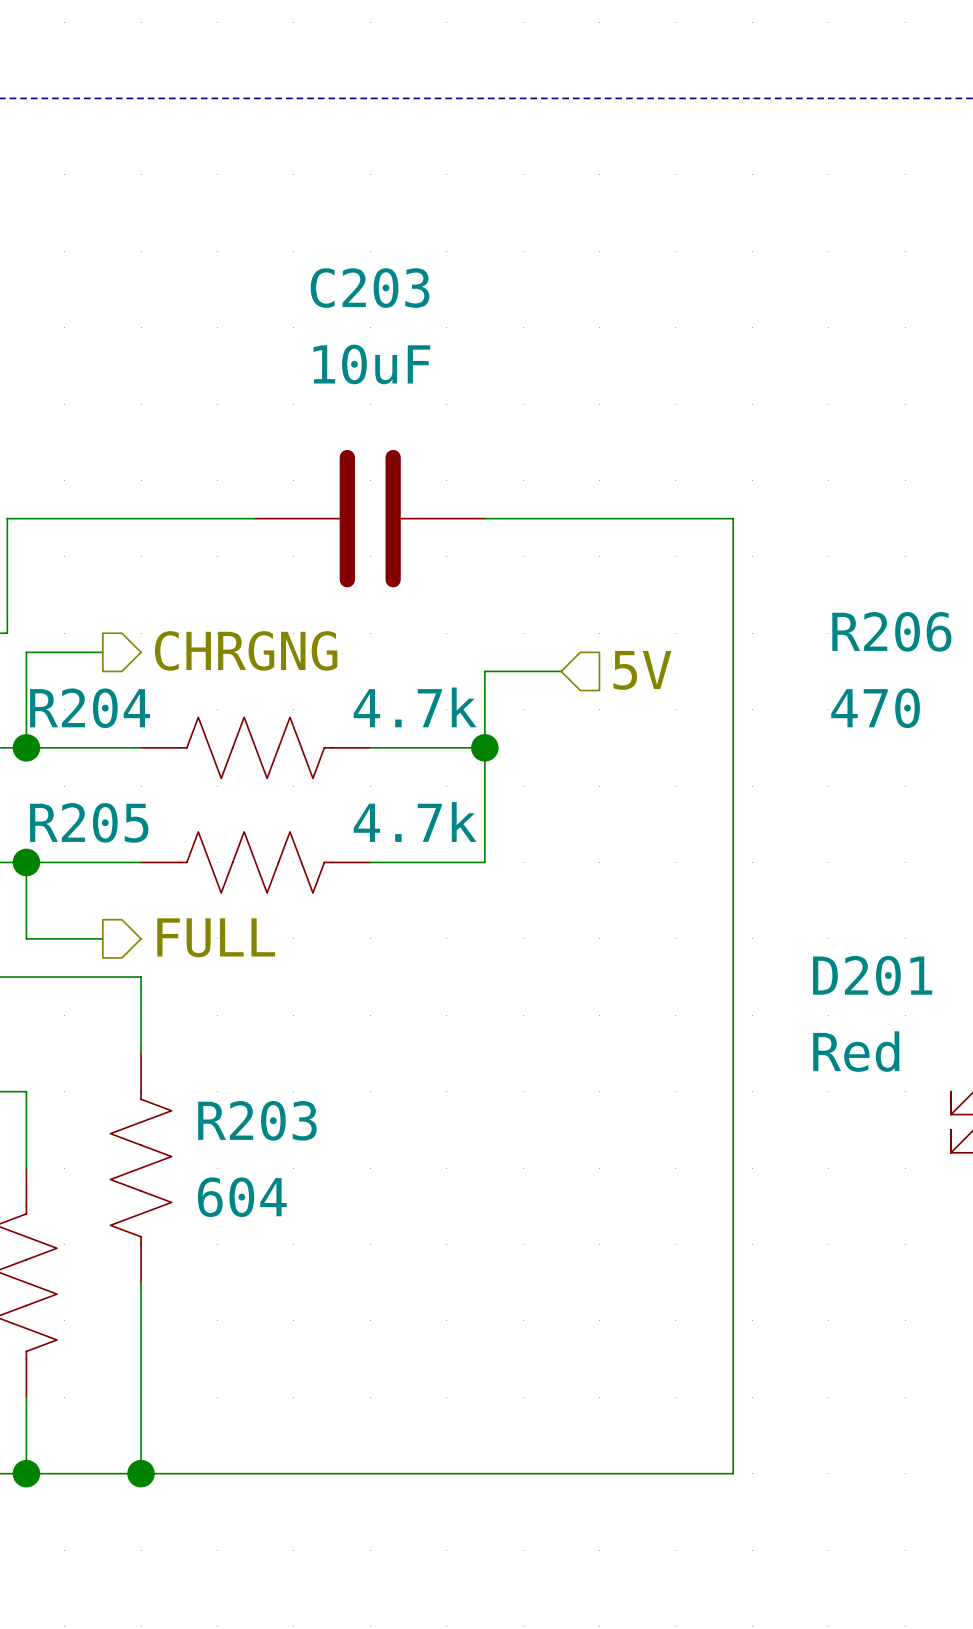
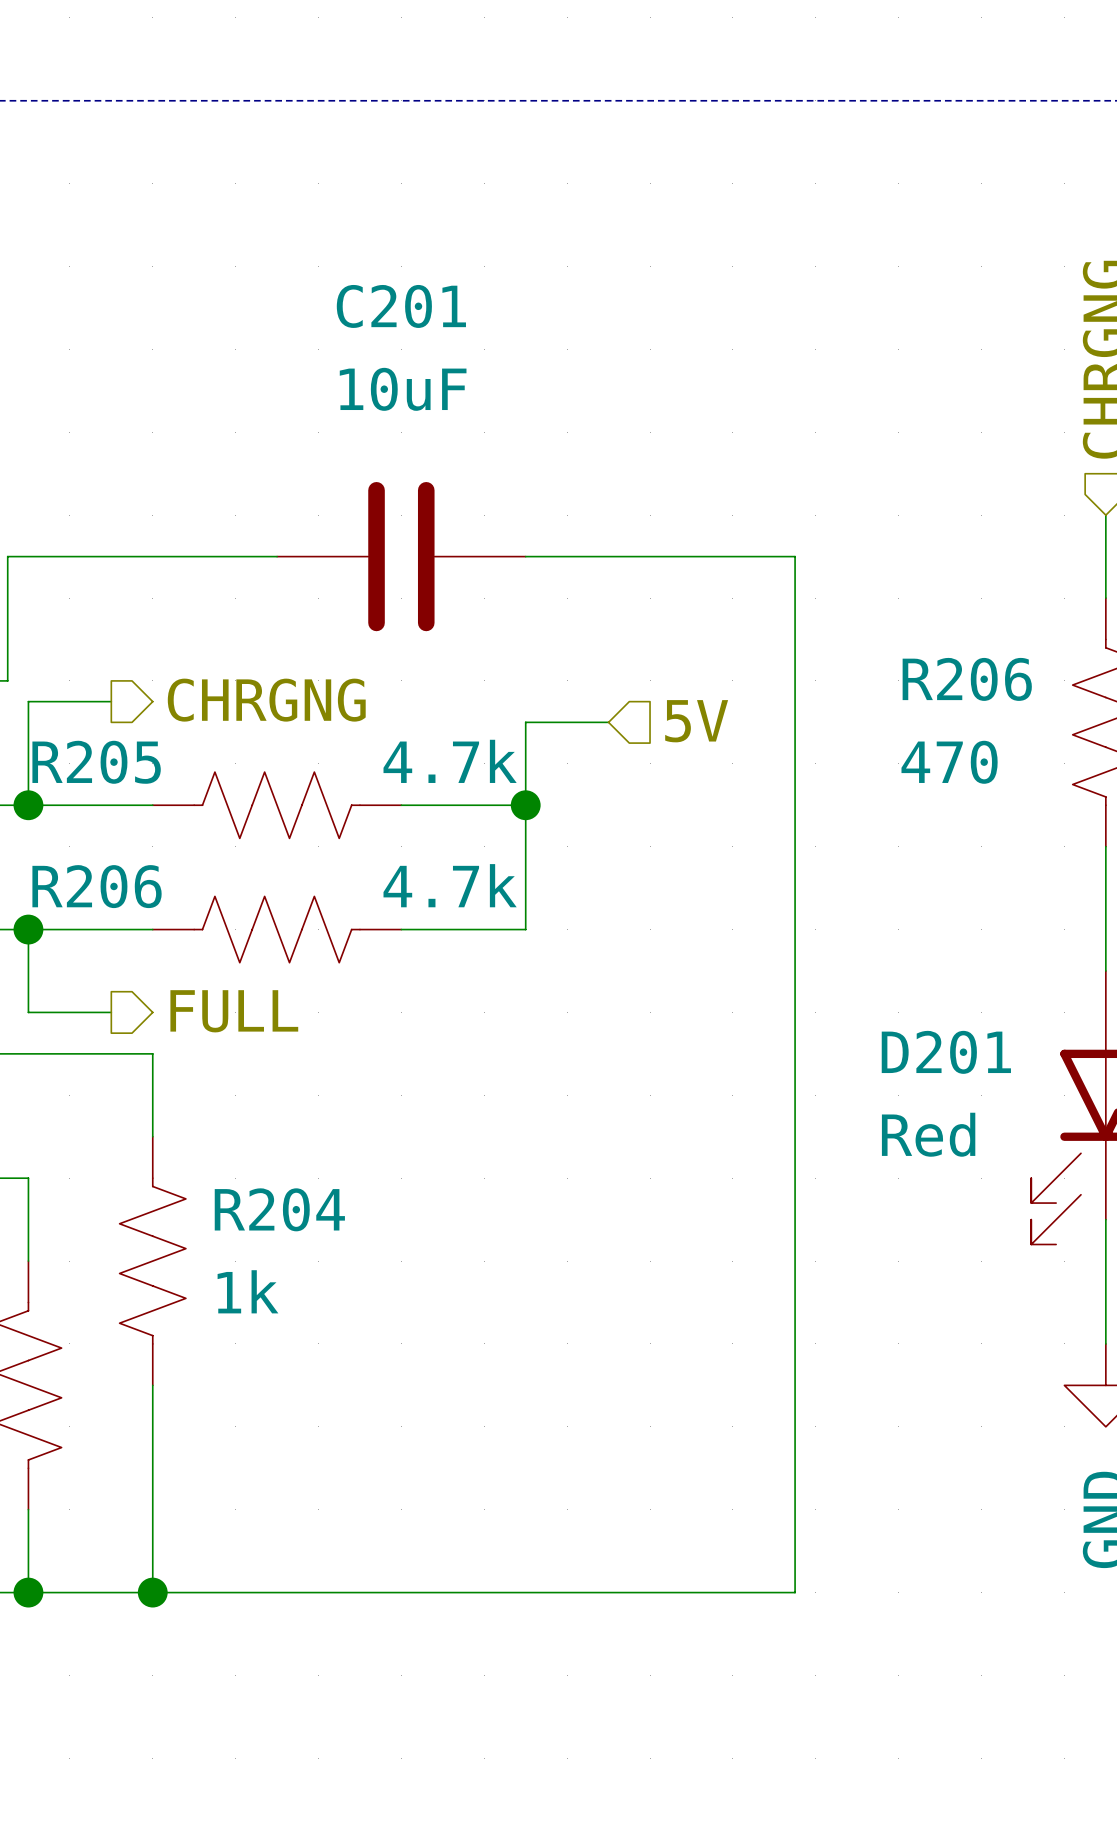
C203 name: C203 (370, 288) -> C201 (401, 306)
R204 name: R204 (90, 708) -> R205 (96, 762)
R205 name: R205 (89, 822) -> R206 (97, 886)
R203 name: R203 (257, 1120) -> R204 (279, 1209)
R203 value: 604 (242, 1197) -> 1k (247, 1291)

